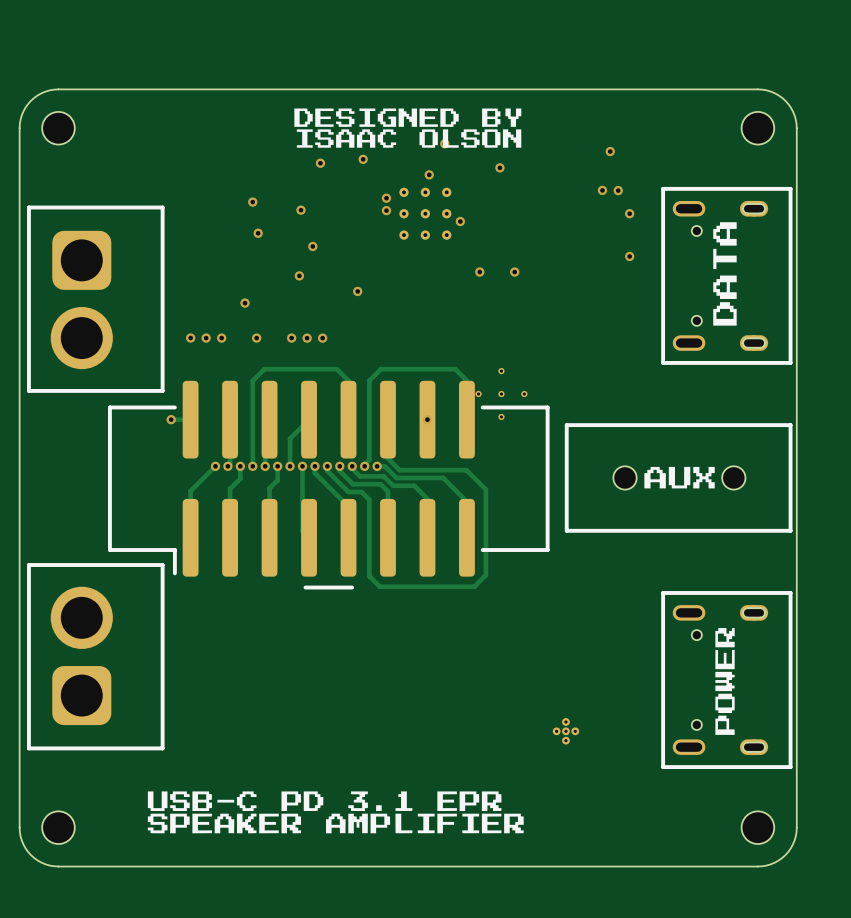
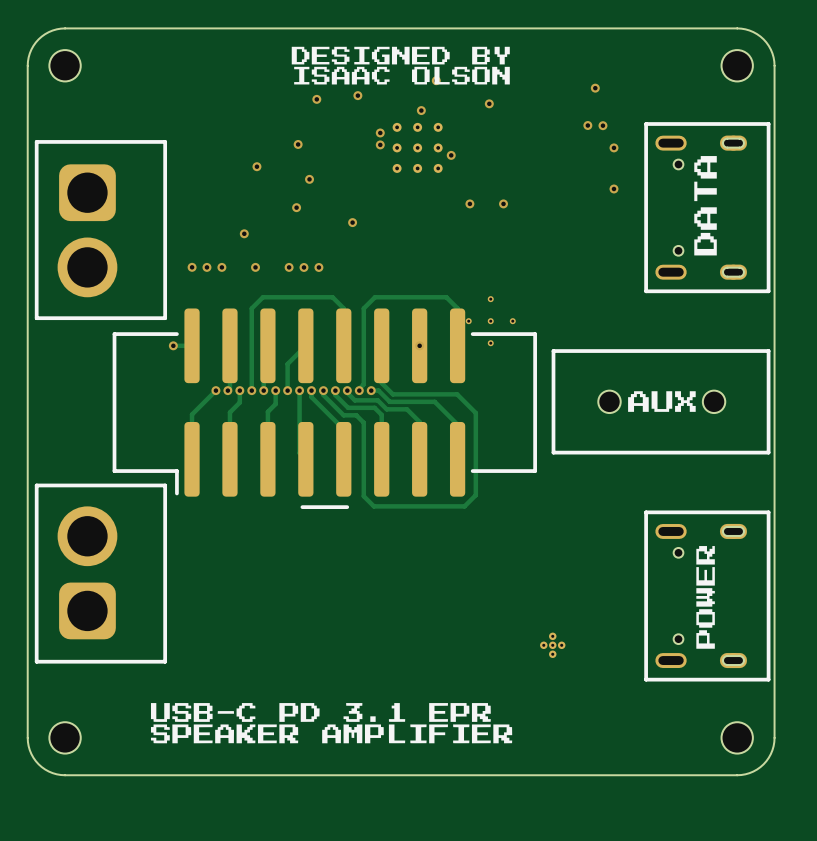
via: (252, 202) -> none

